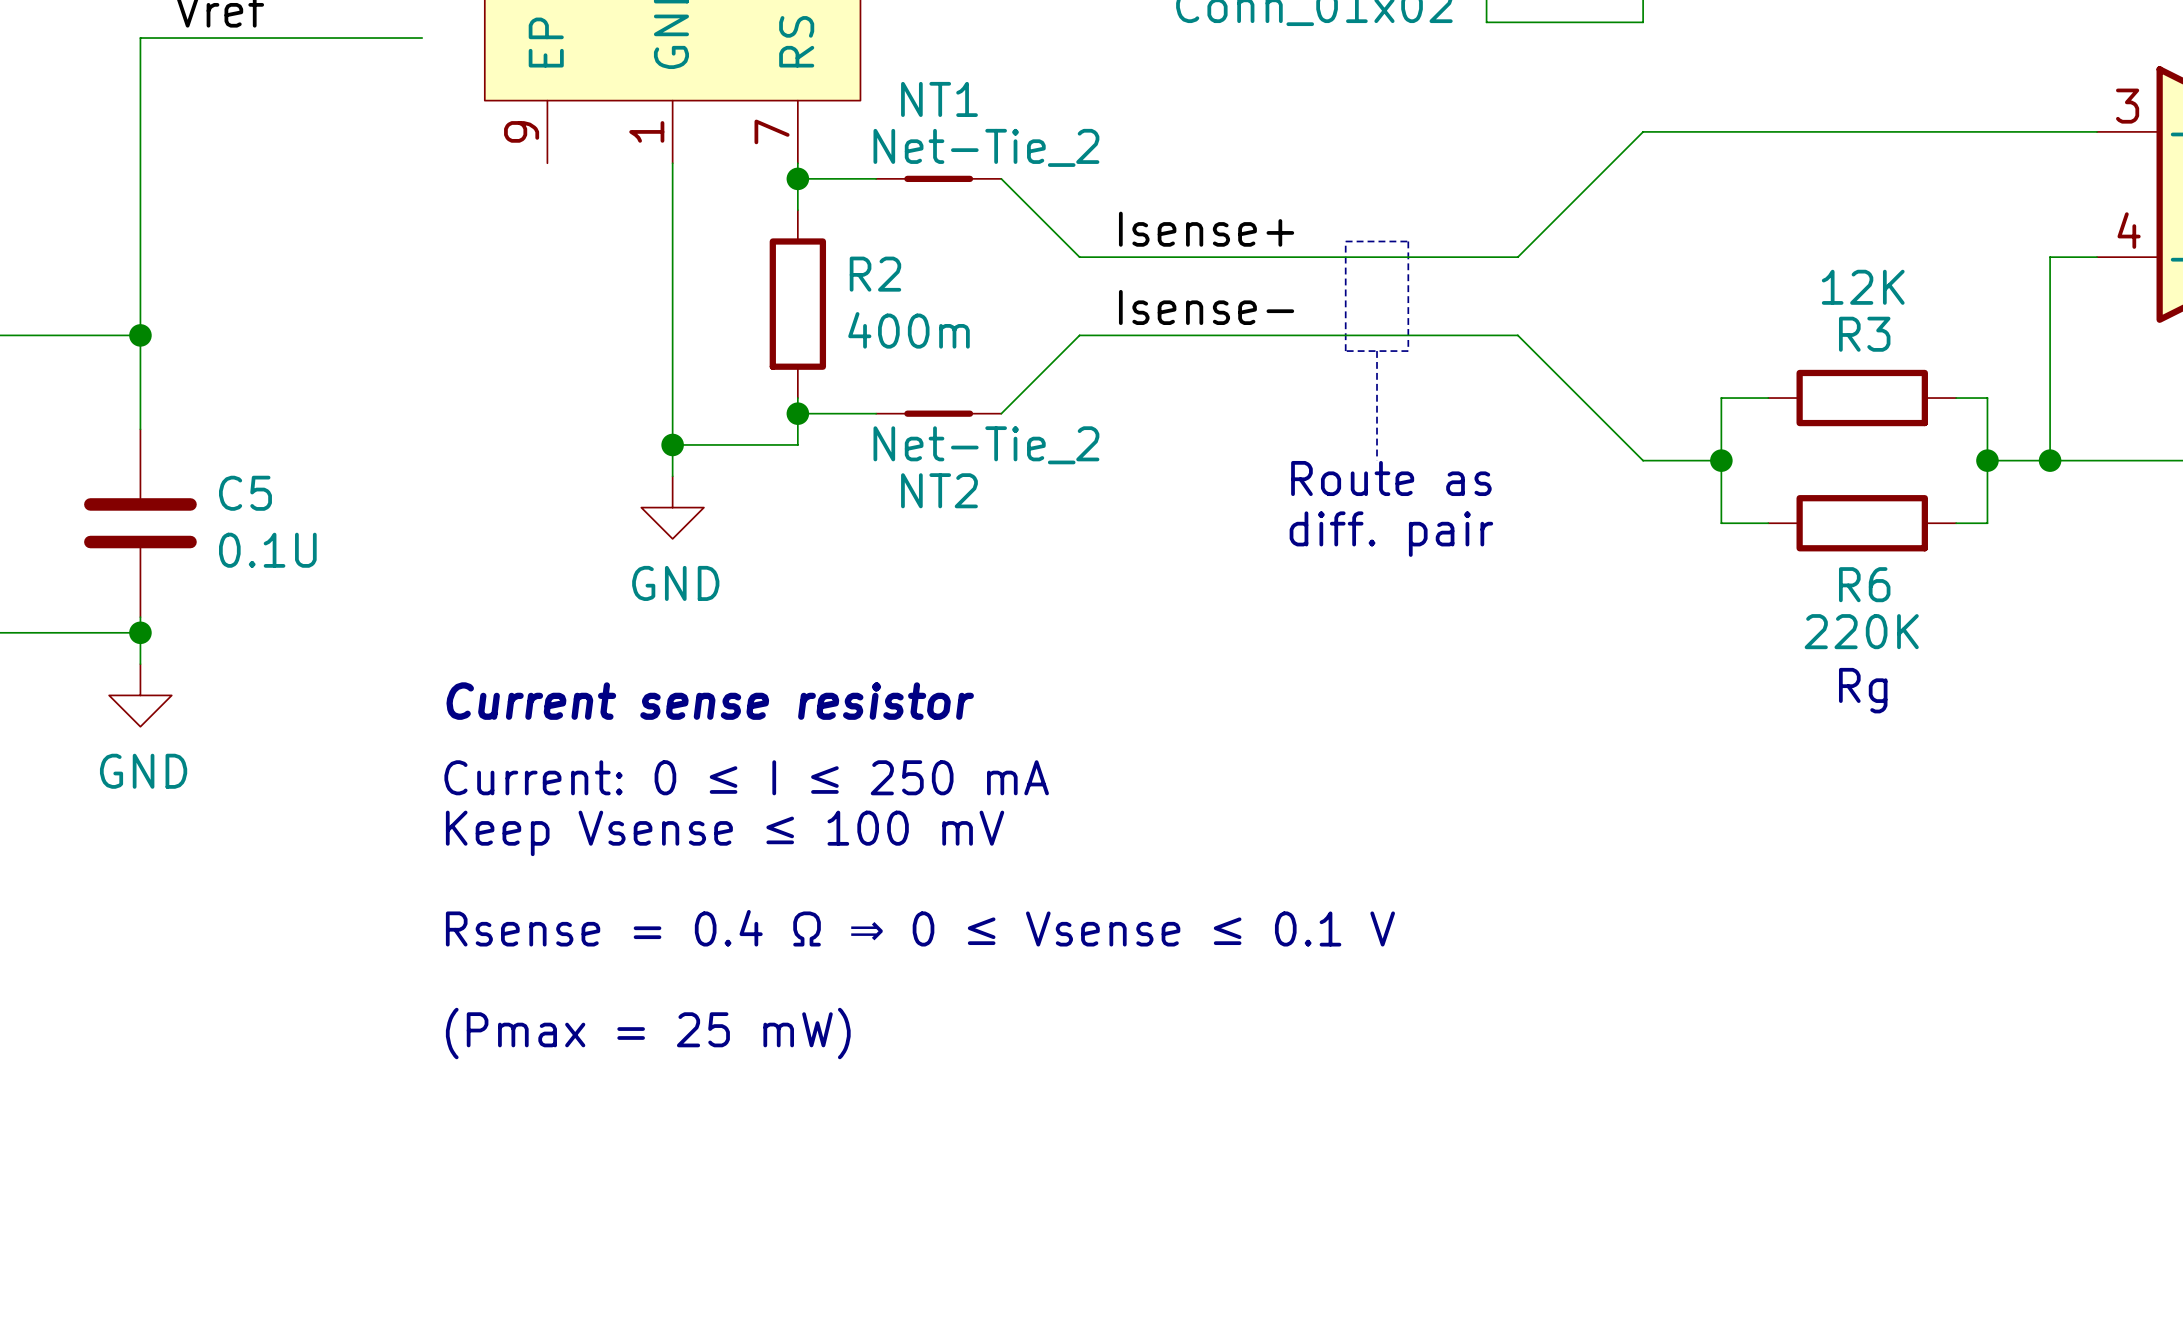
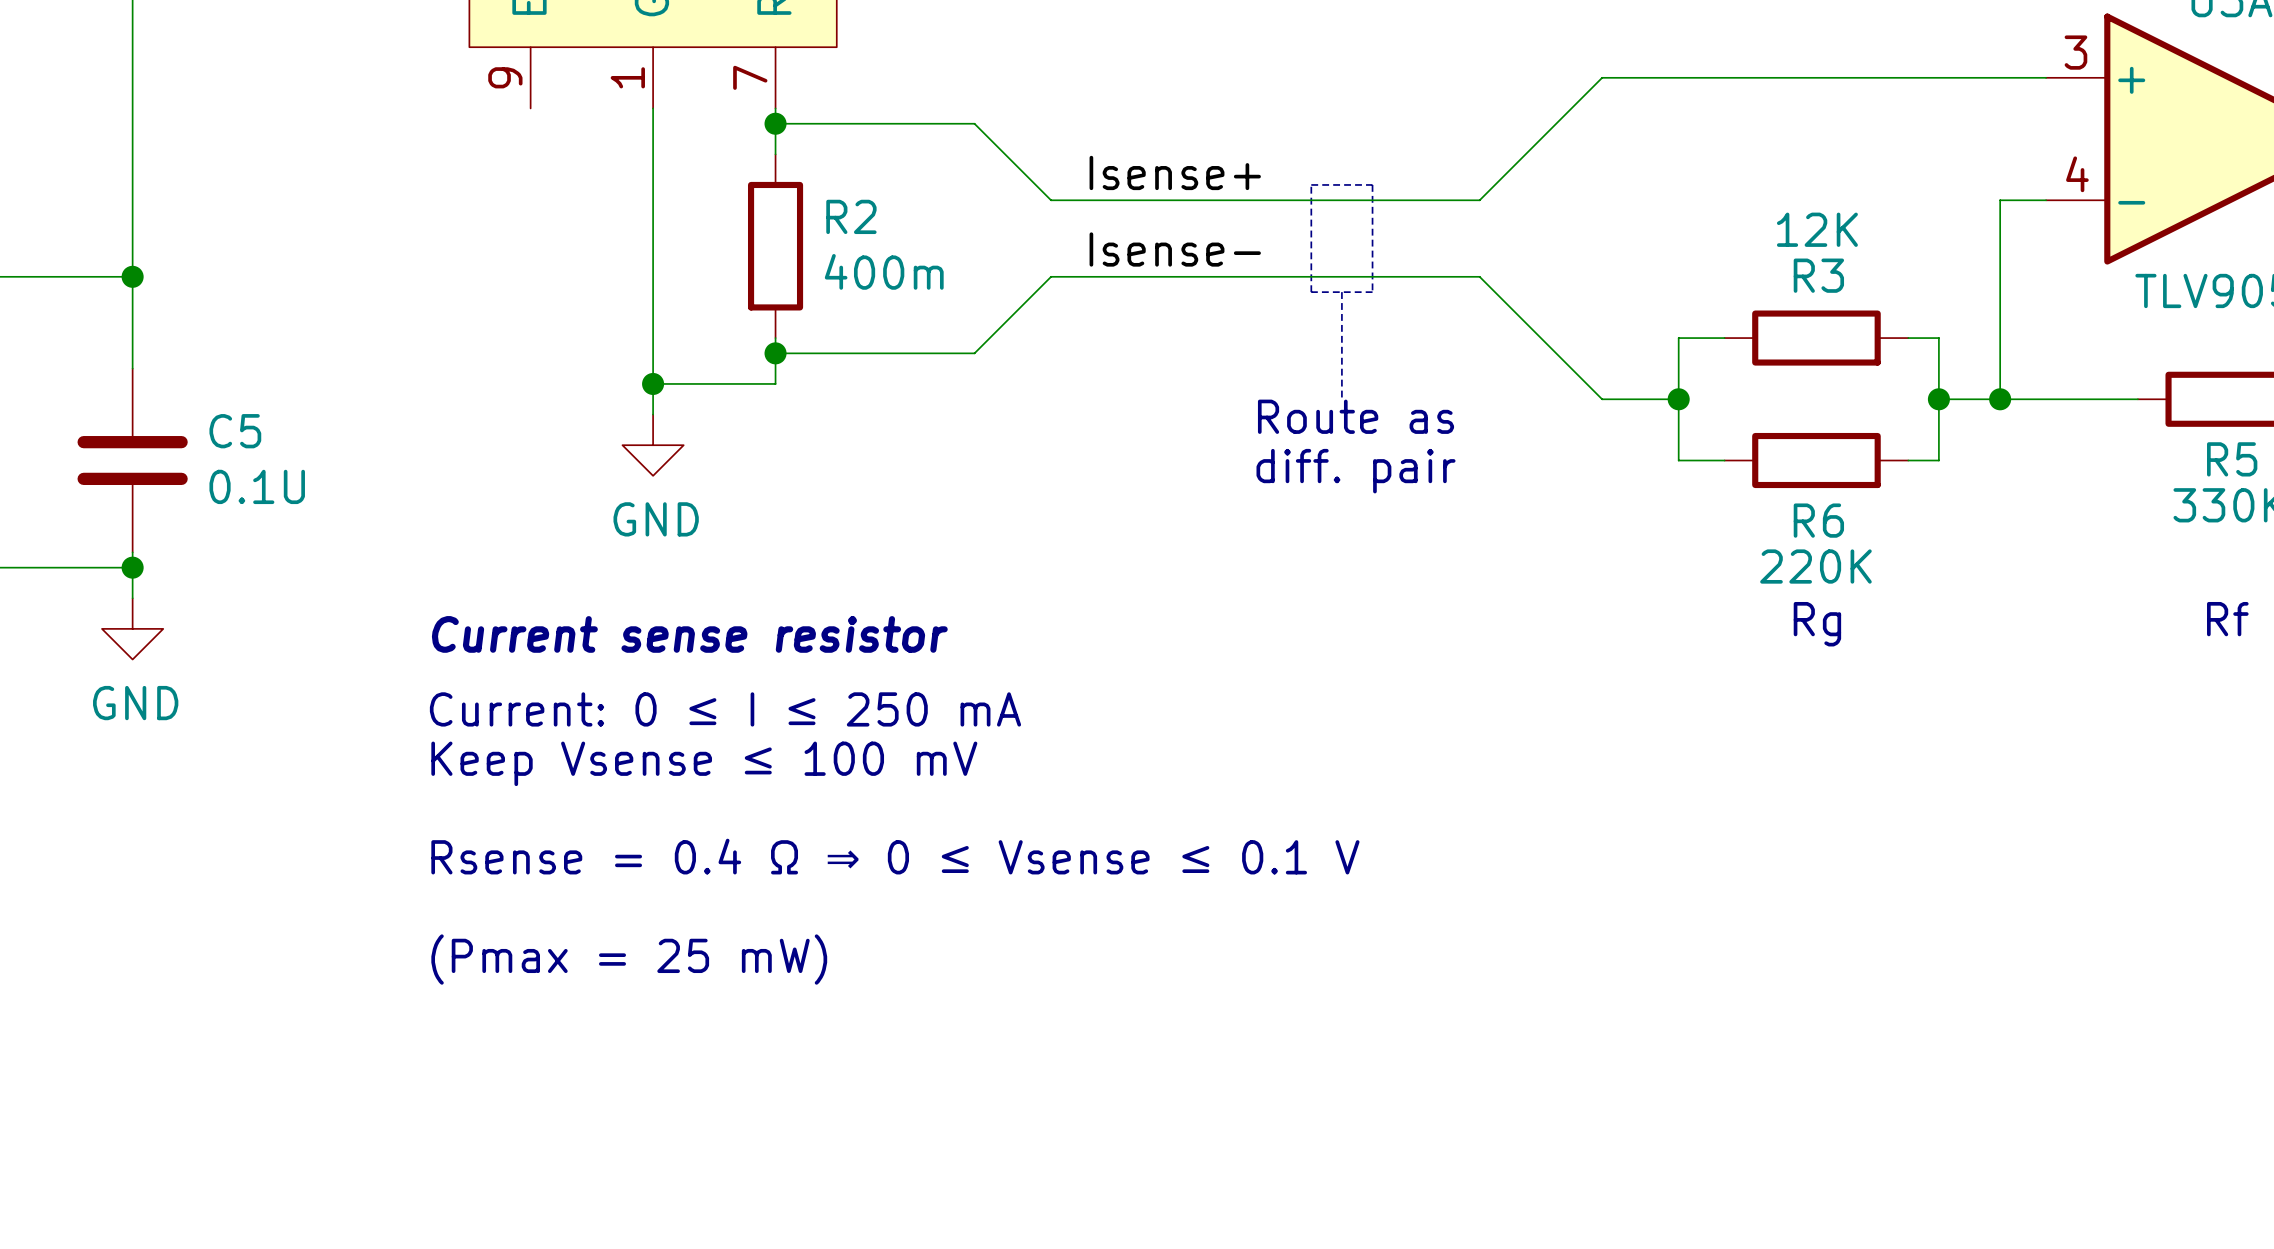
NT1: Net-Tie_2 (938, 178) -> none
NT2: Net-Tie_2 (938, 413) -> none

